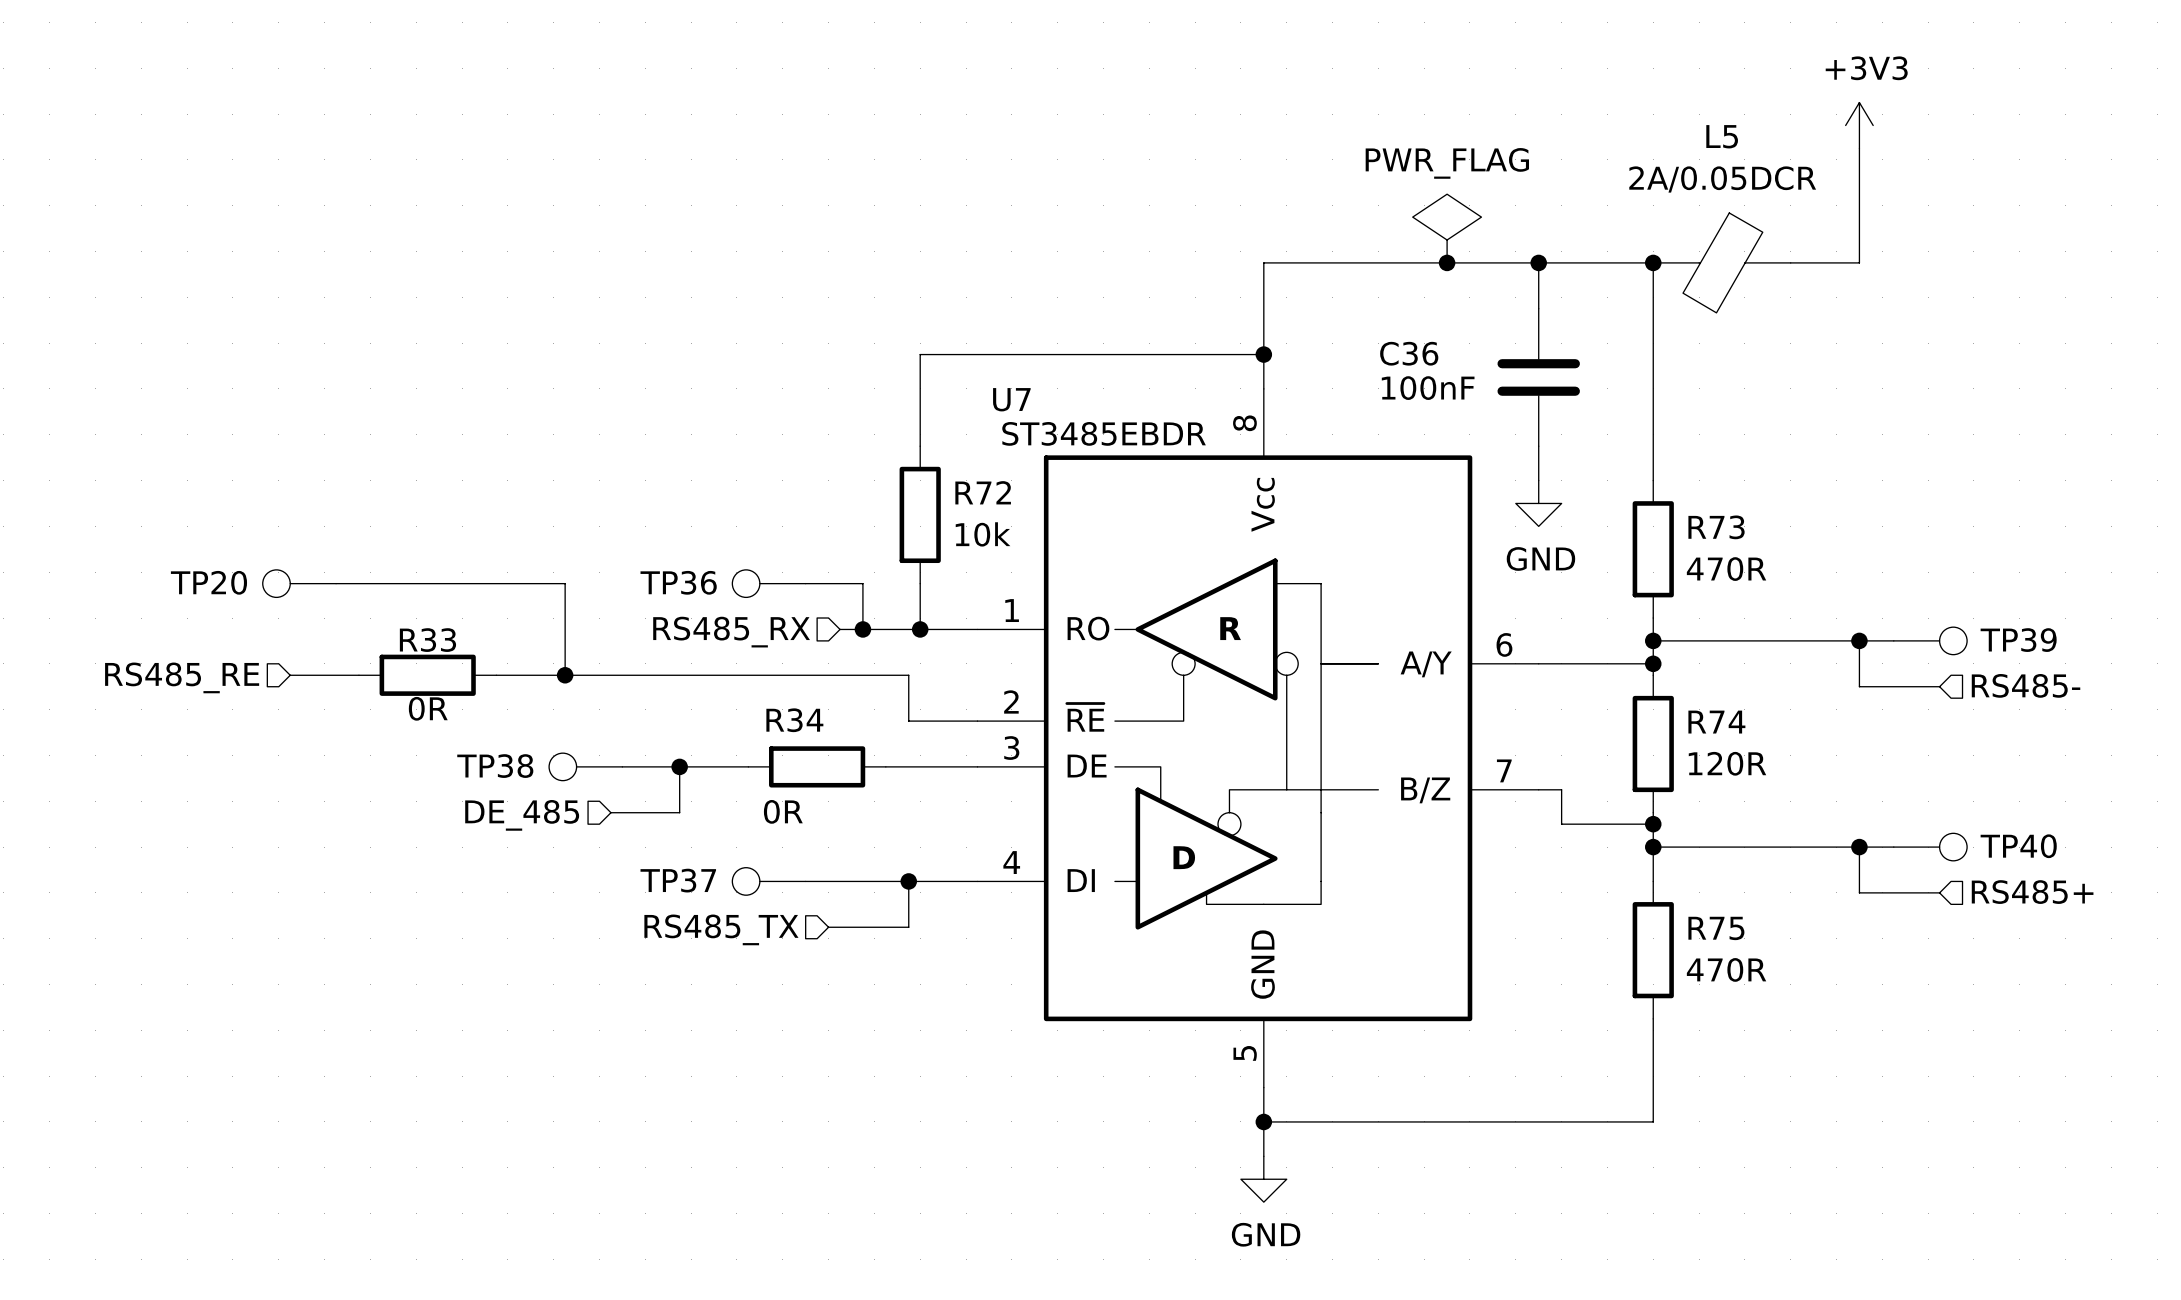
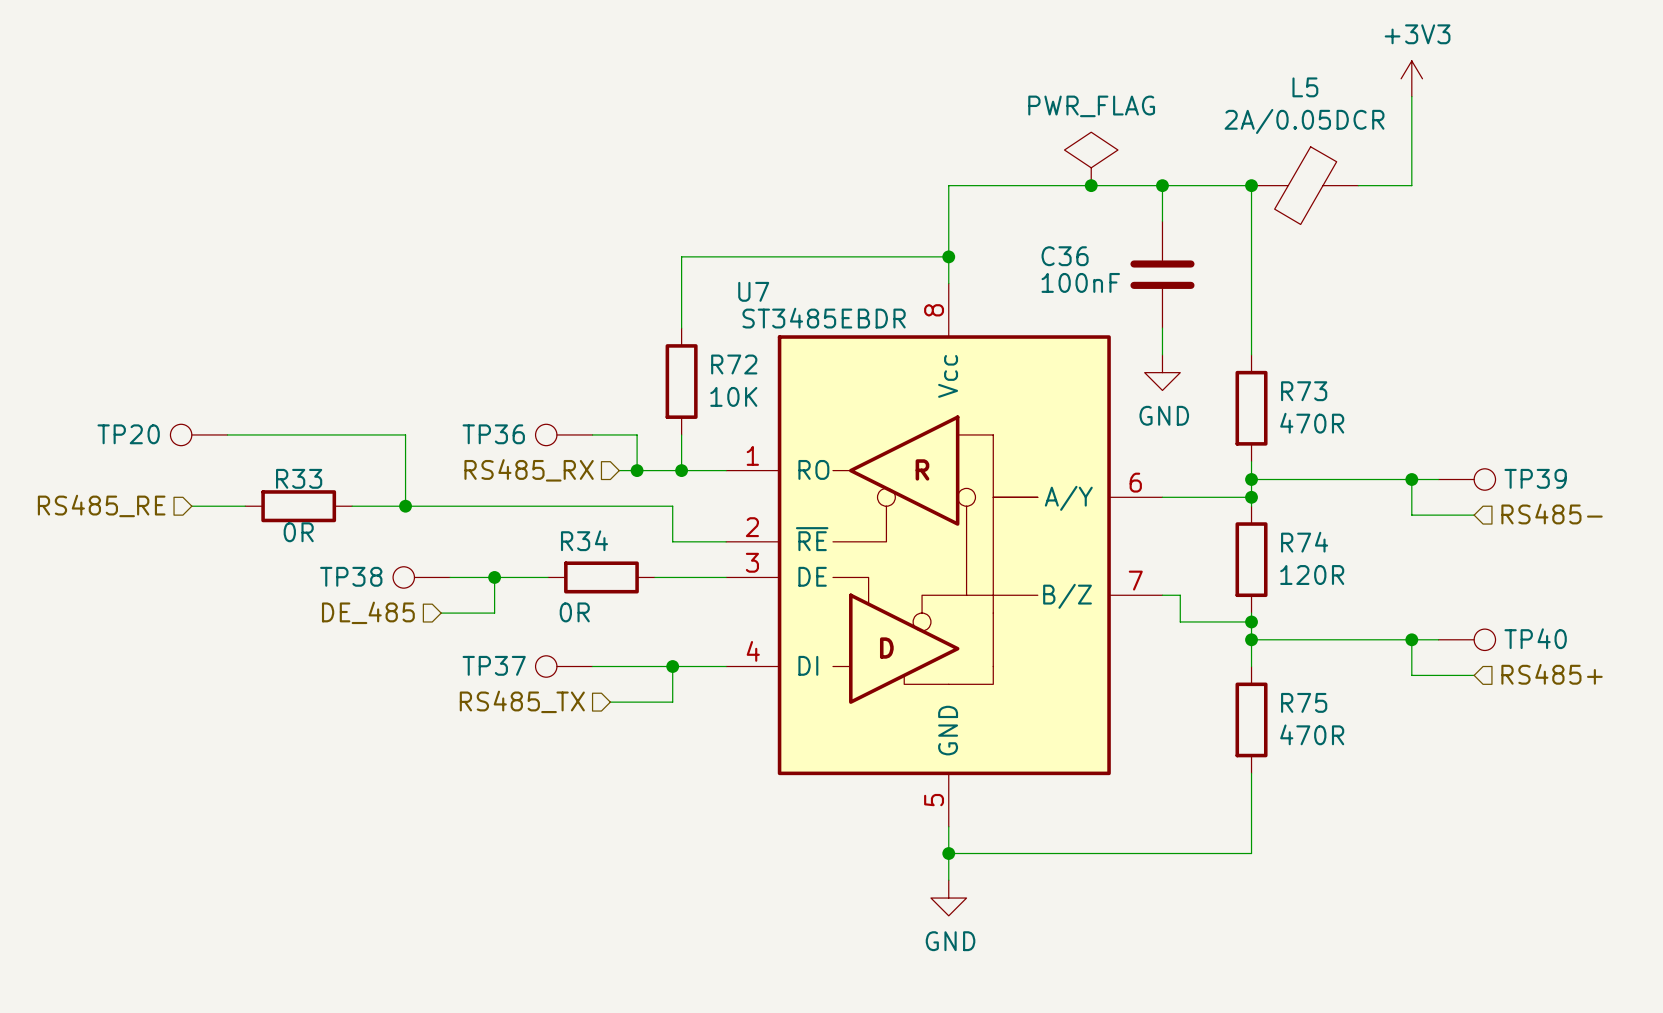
R72 value: 10k (983, 534) -> 10K (733, 396)

